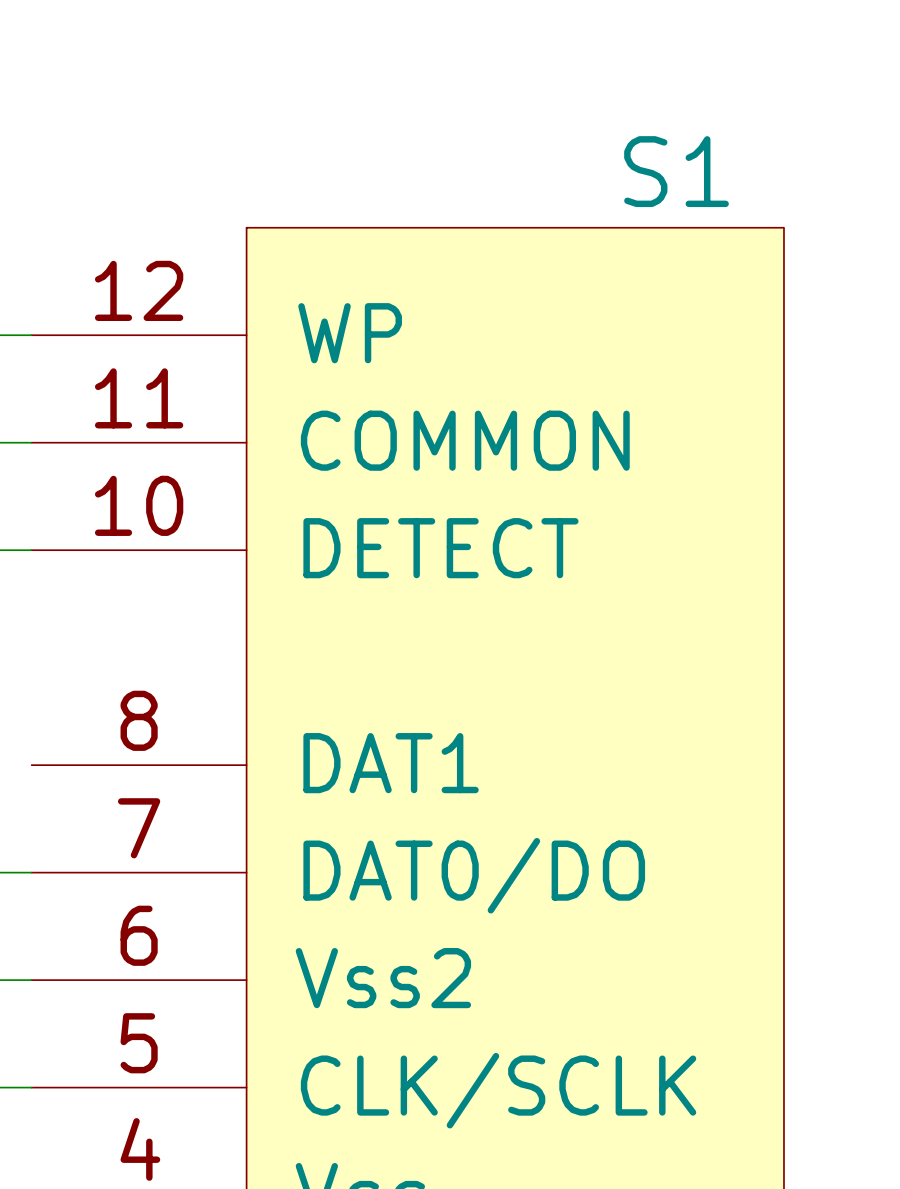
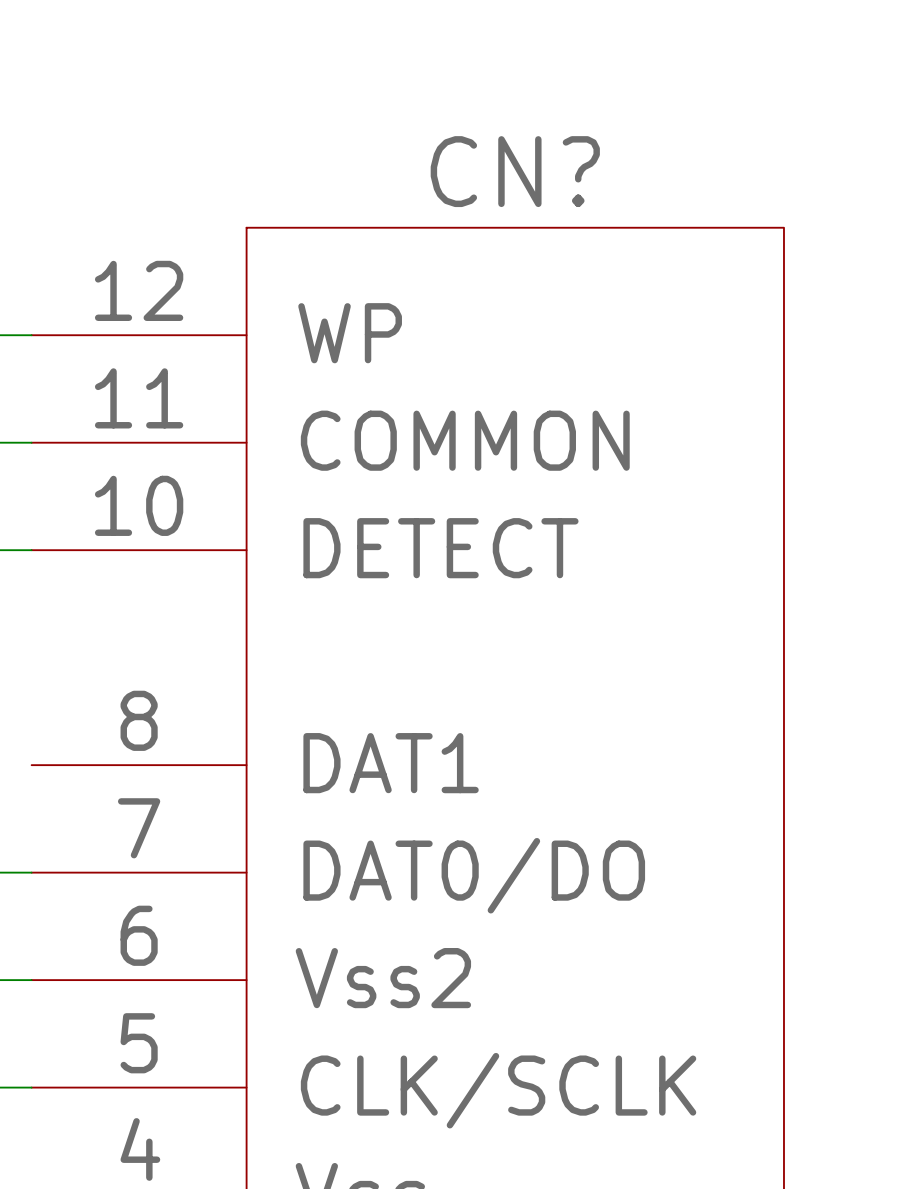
S1 name: S1 (676, 171) -> CN? (515, 171)

